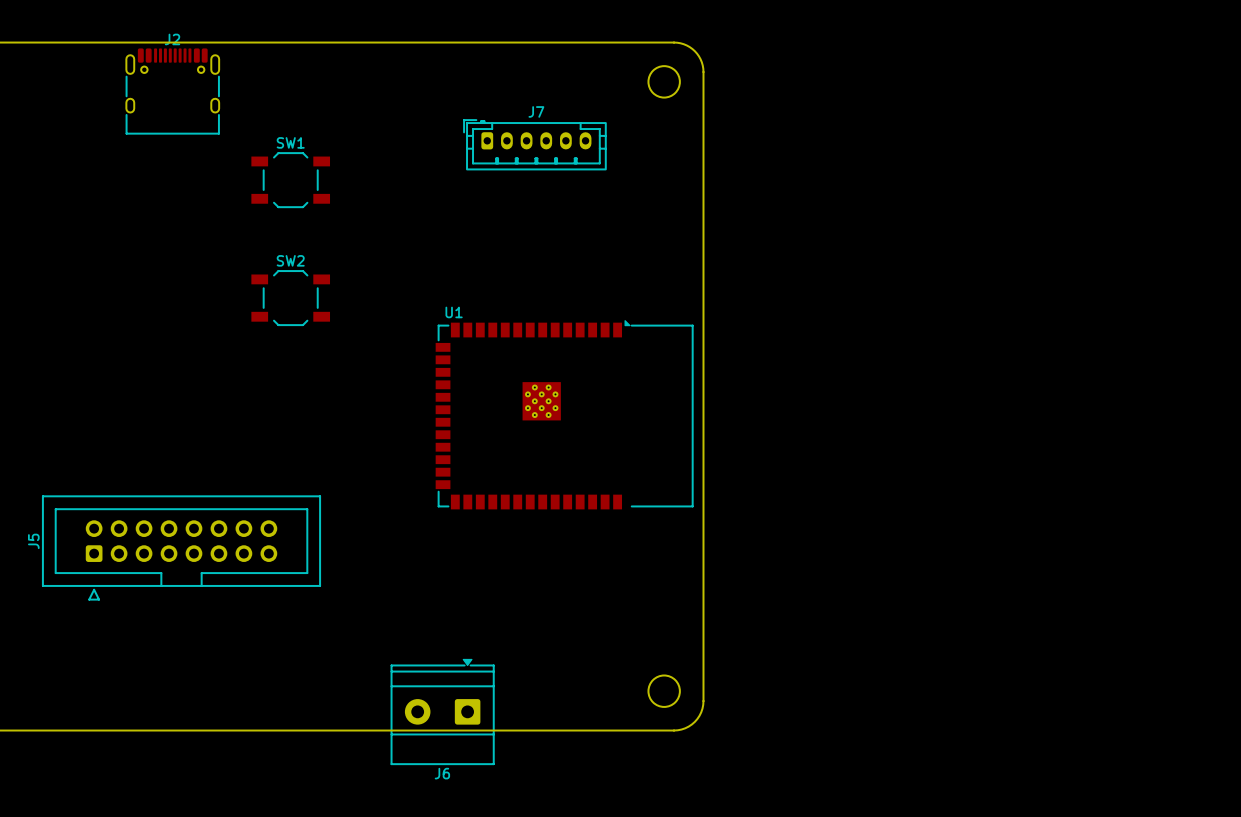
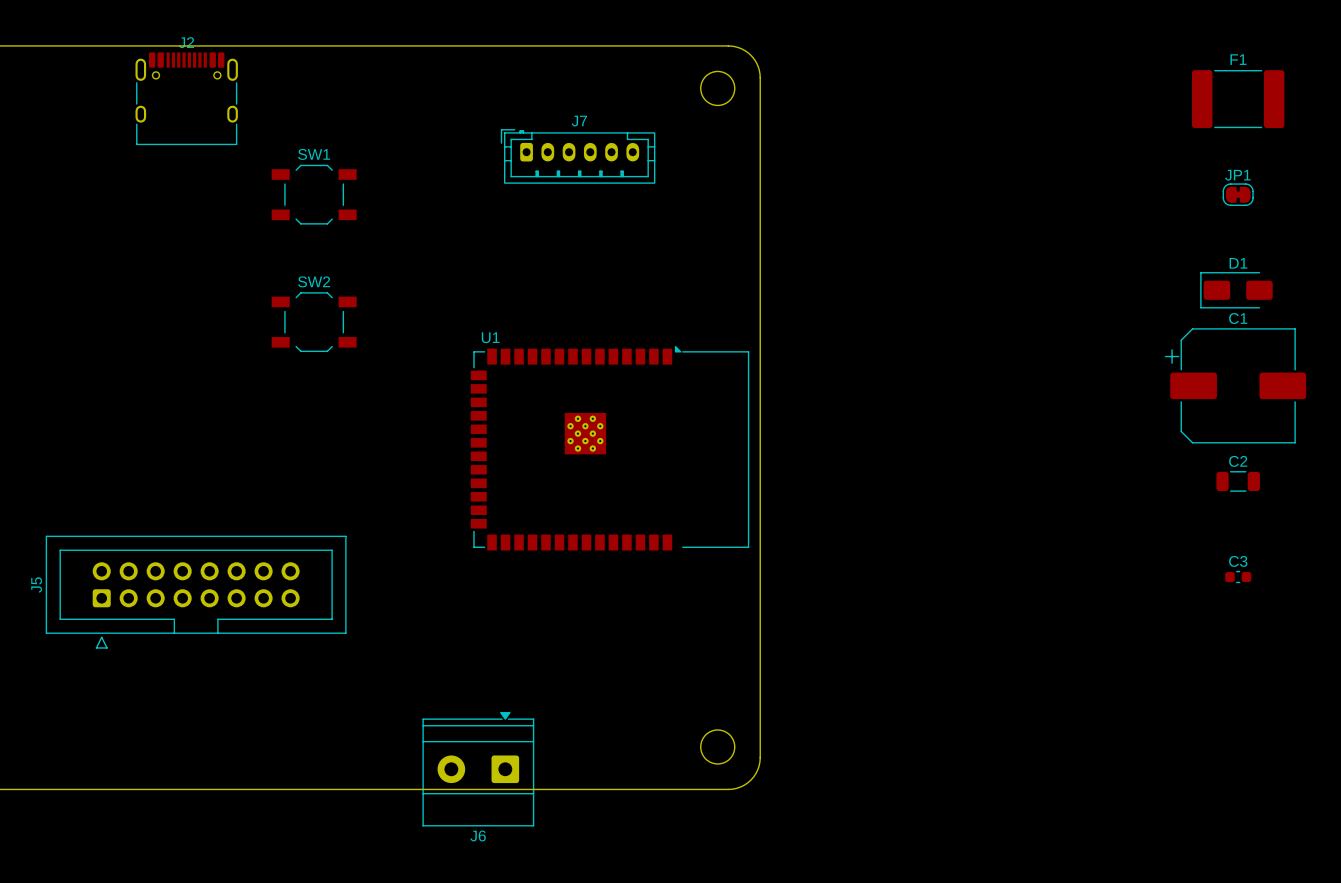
F1: none -> (1238, 99)
JP1: none -> (1238, 194)
D1: none -> (1236, 290)
C1: none -> (1235, 385)
C2: none -> (1238, 481)
C3: none -> (1238, 577)

